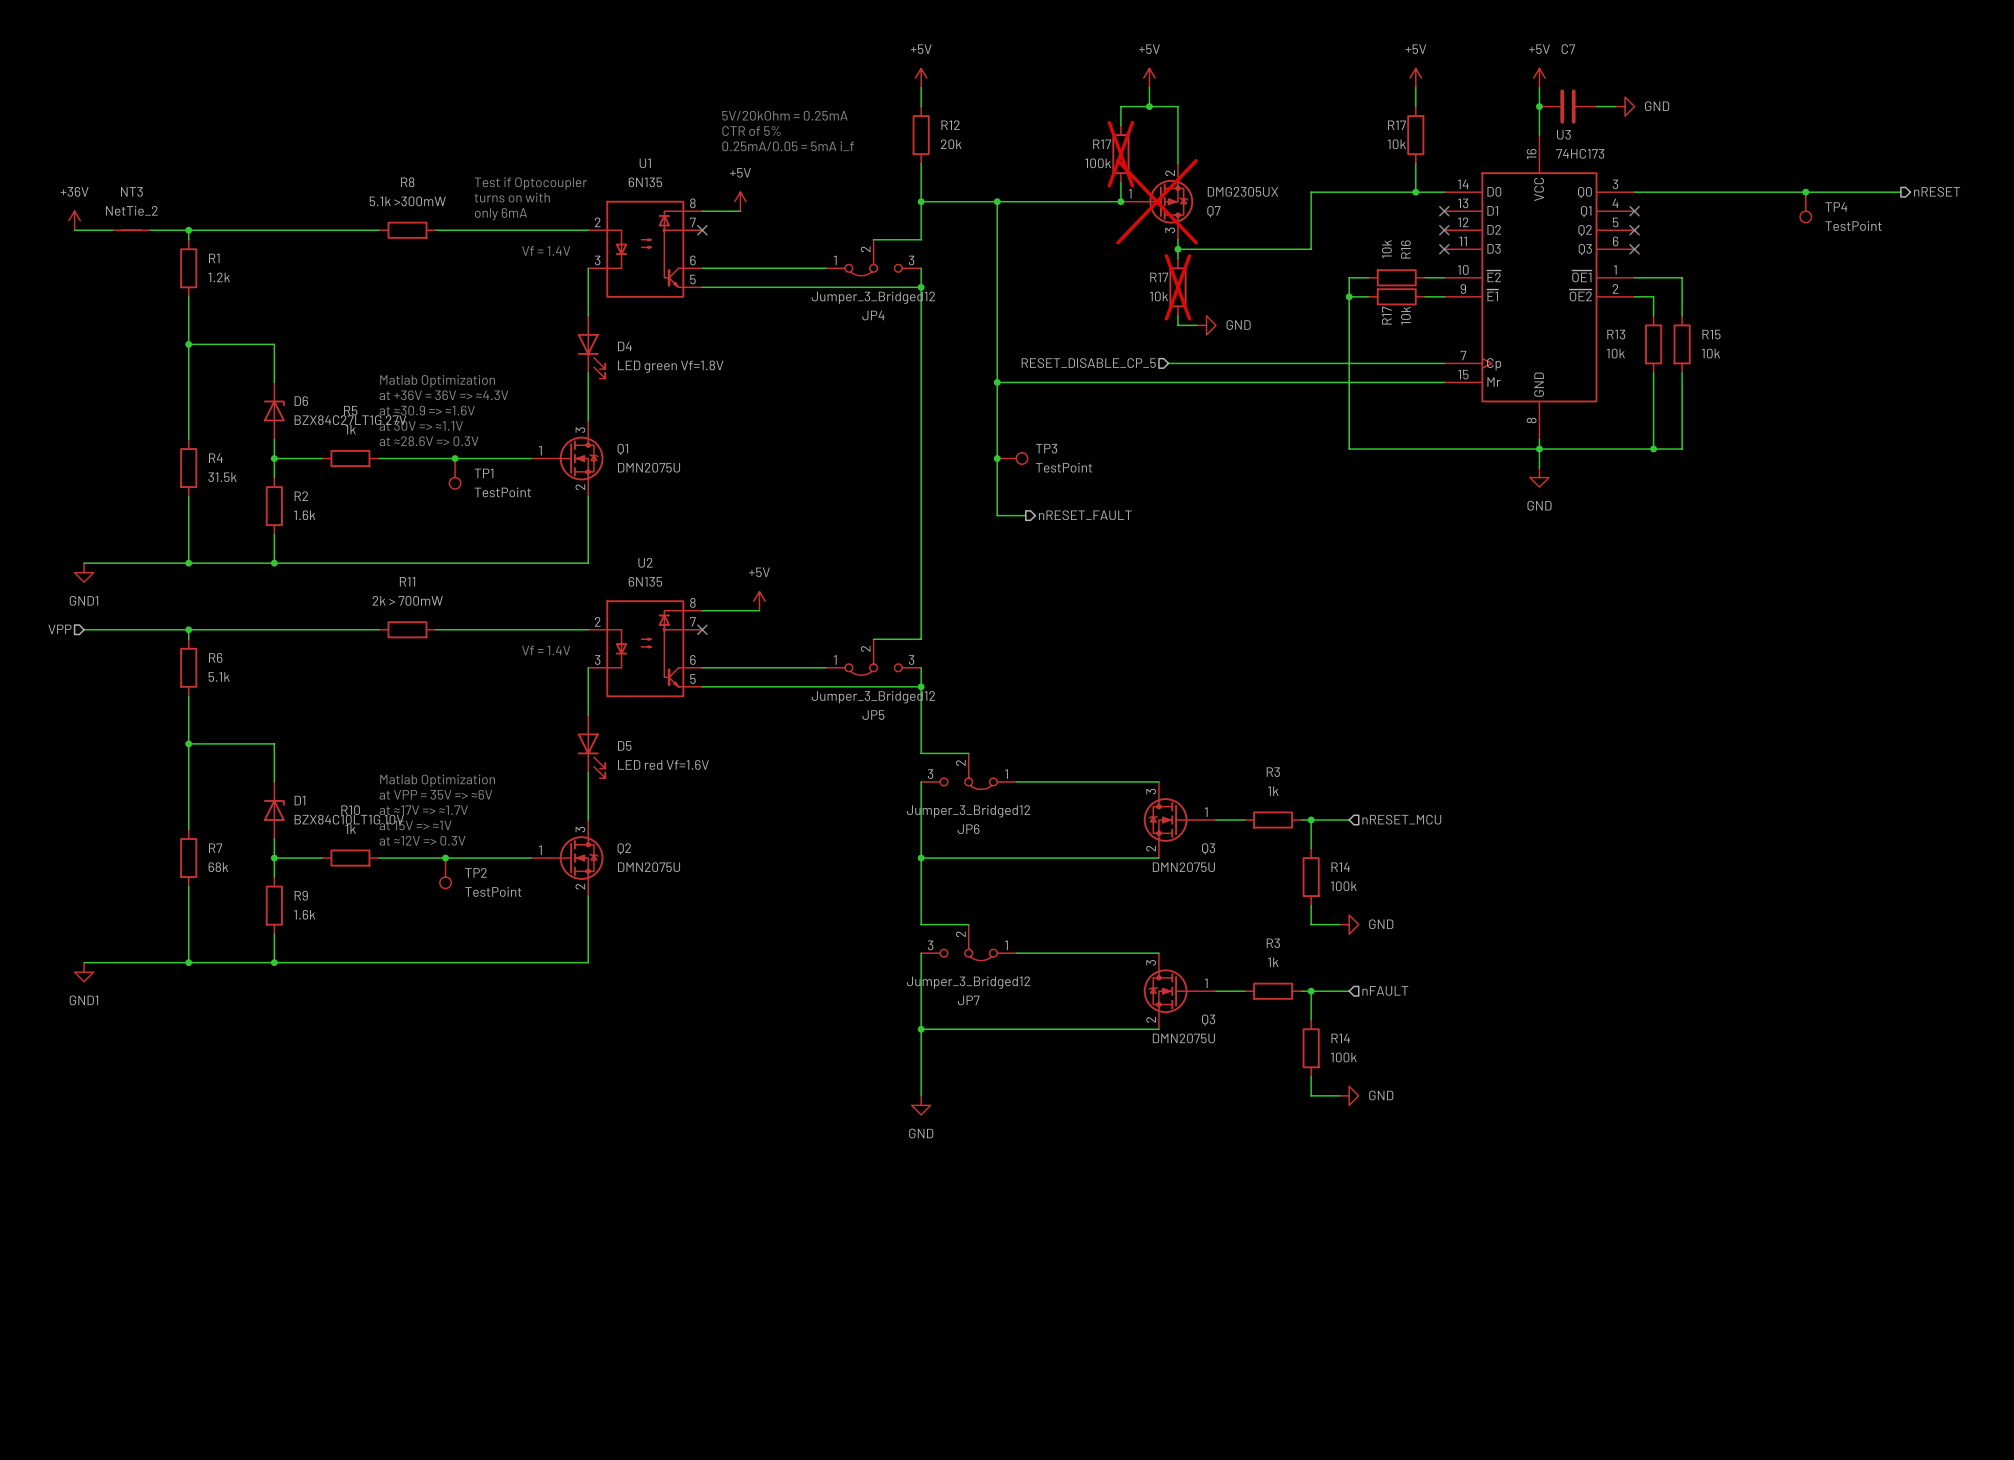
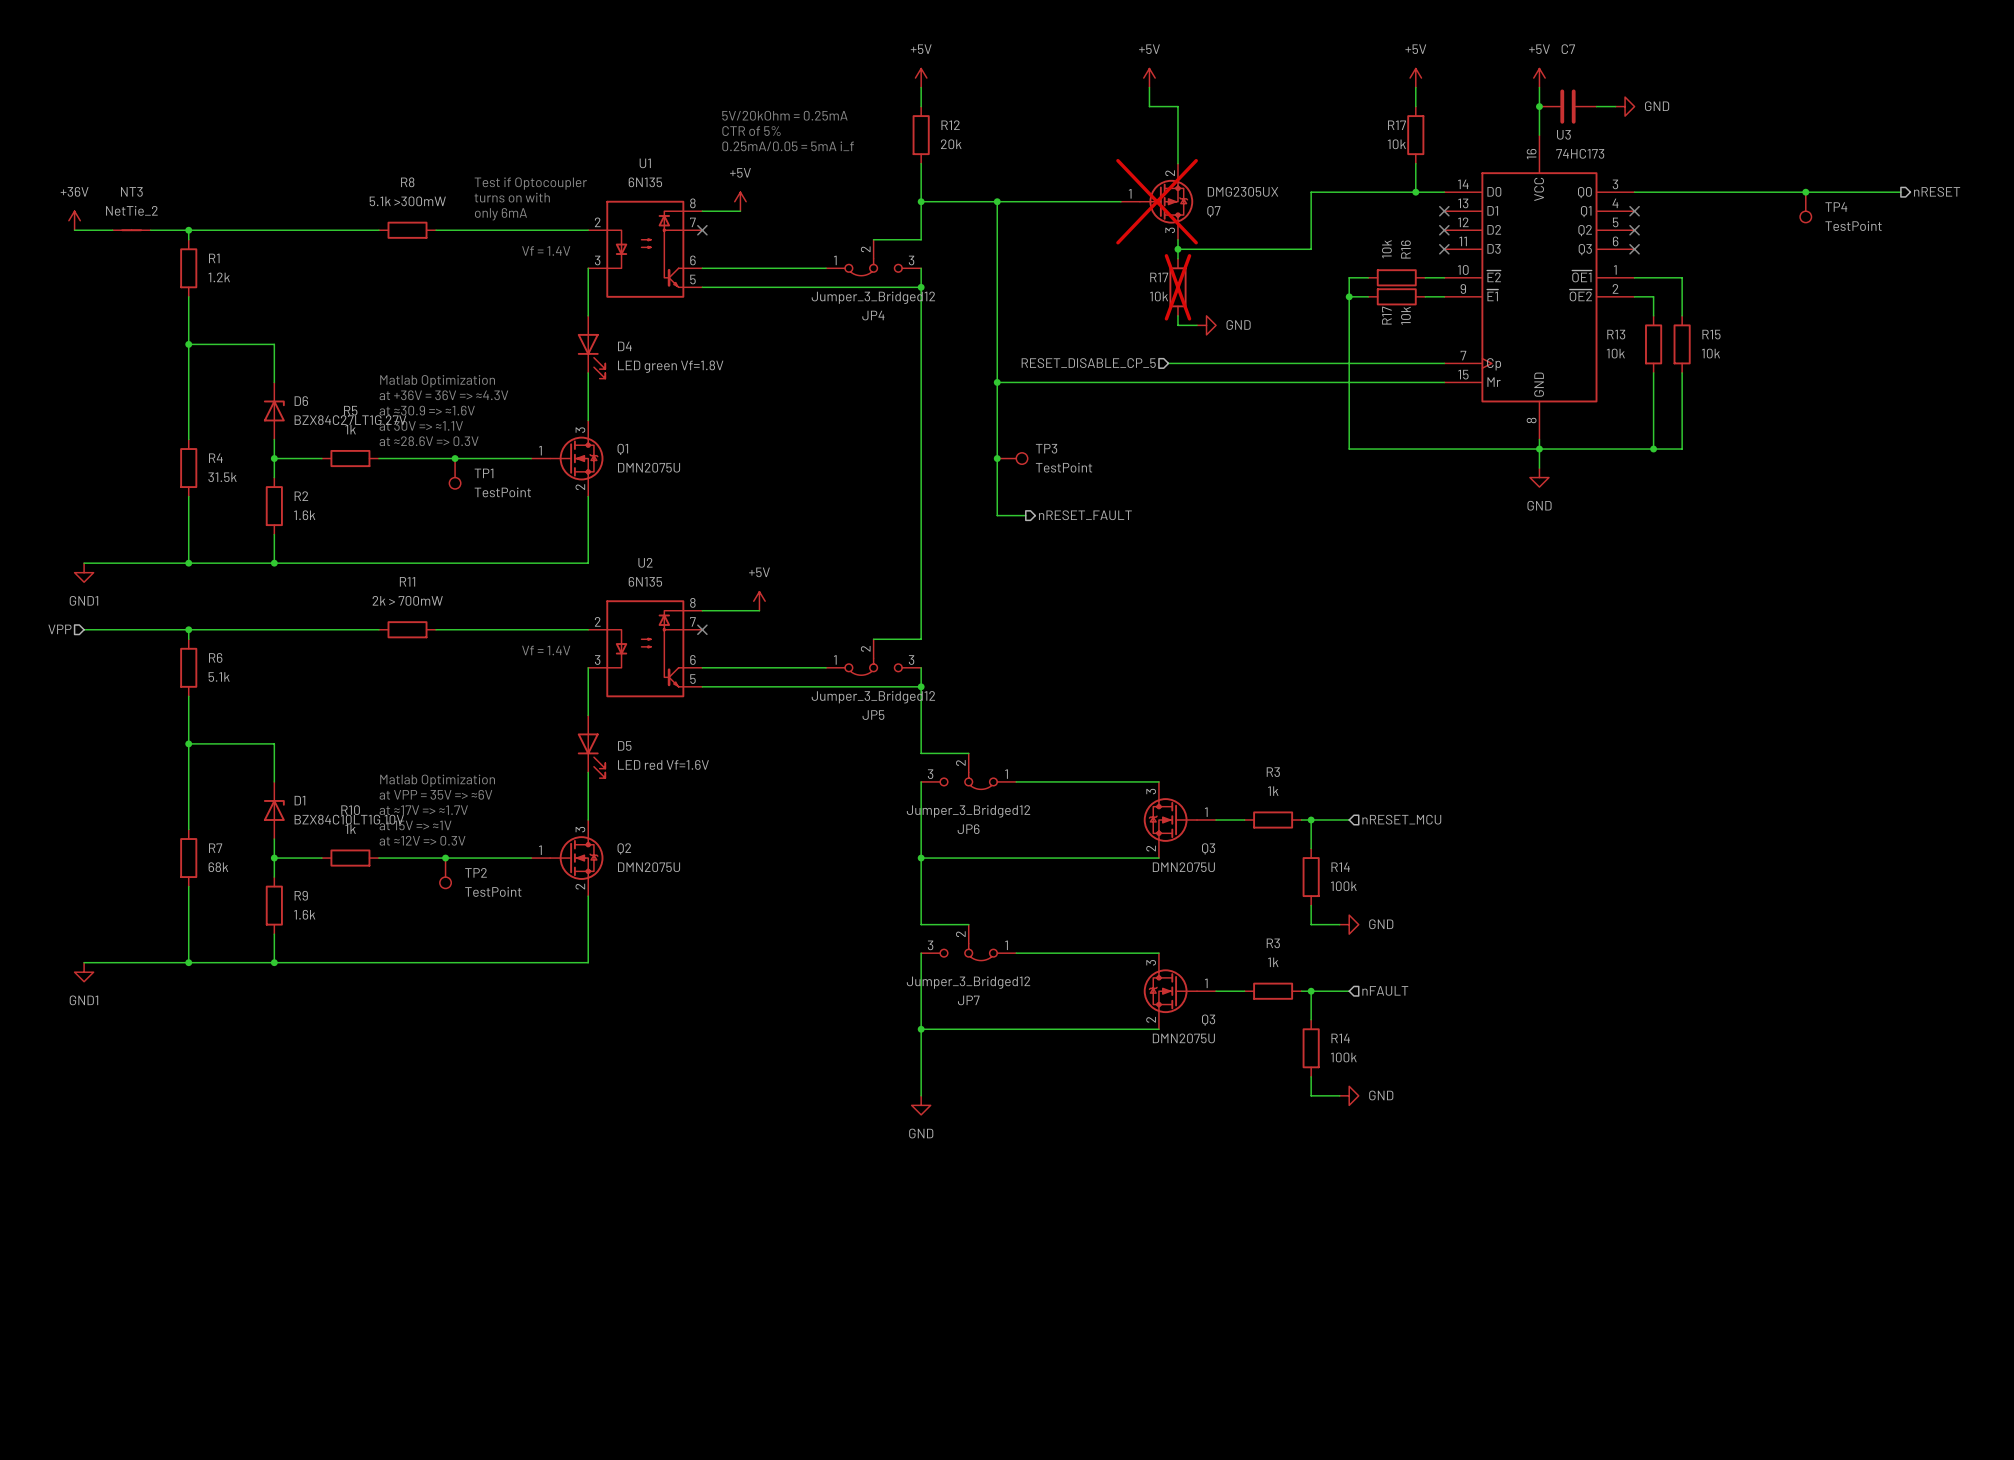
wire: (1149, 106) (1120, 106) (1120, 125) -> none
junction: (1149, 106) -> none
R17: 100k (1120, 154) -> none
wire: (1120, 182) (1120, 201) -> none
junction: (1120, 201) -> none

